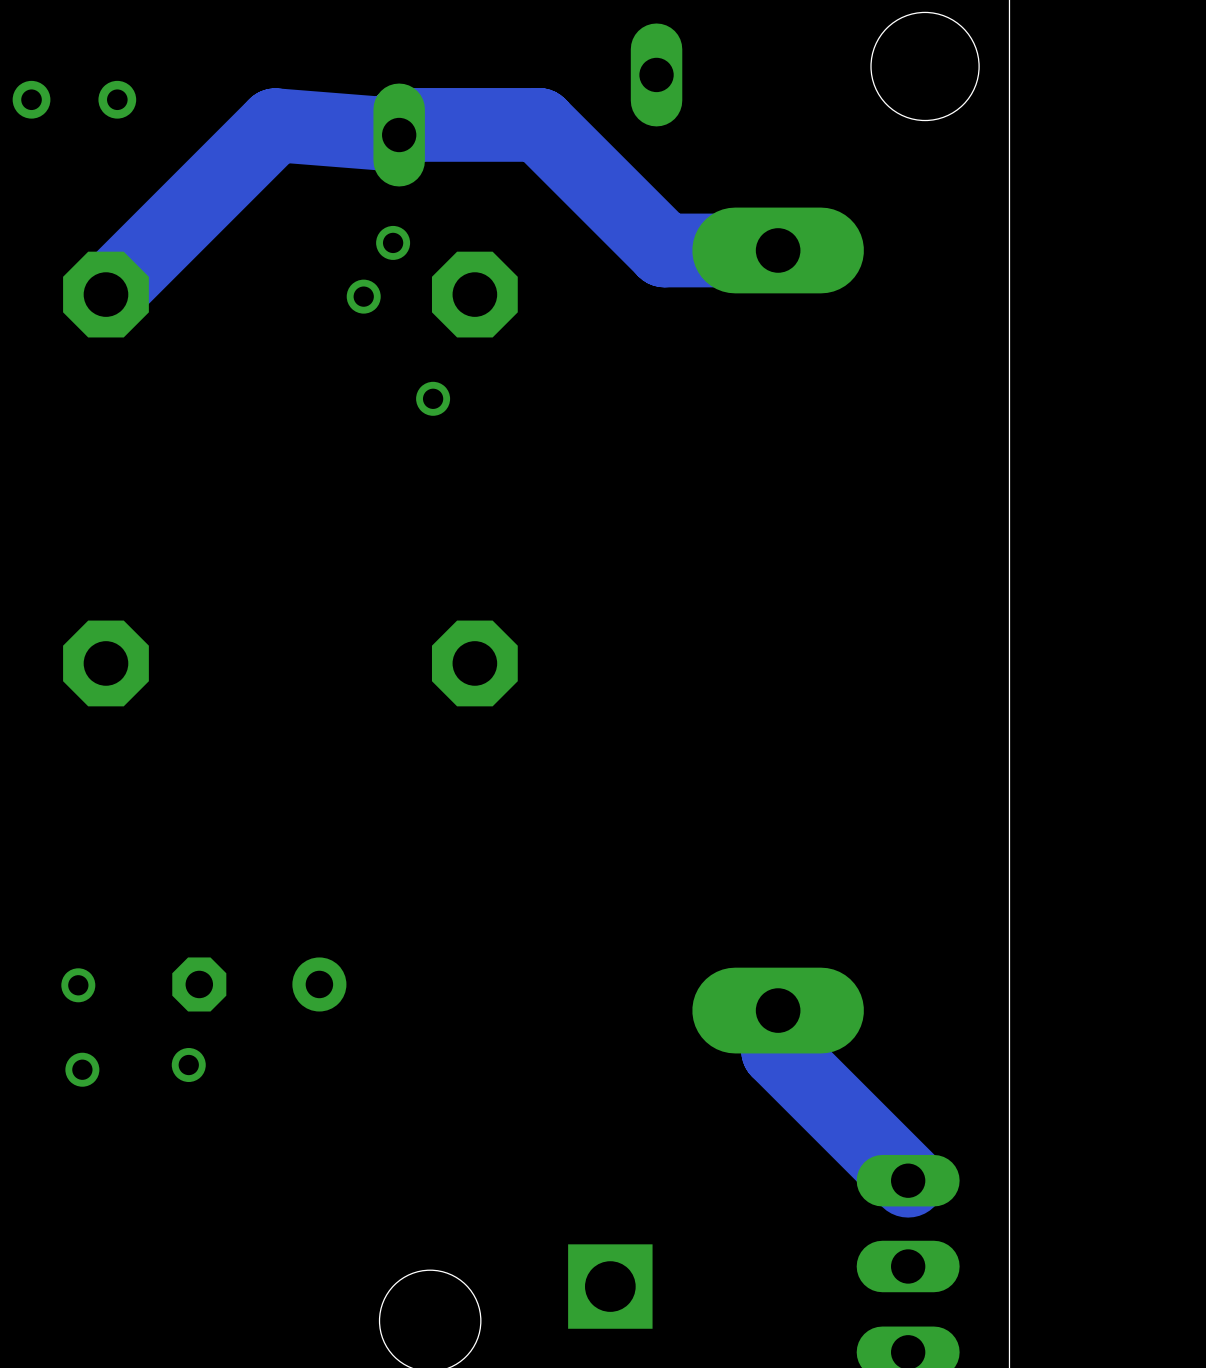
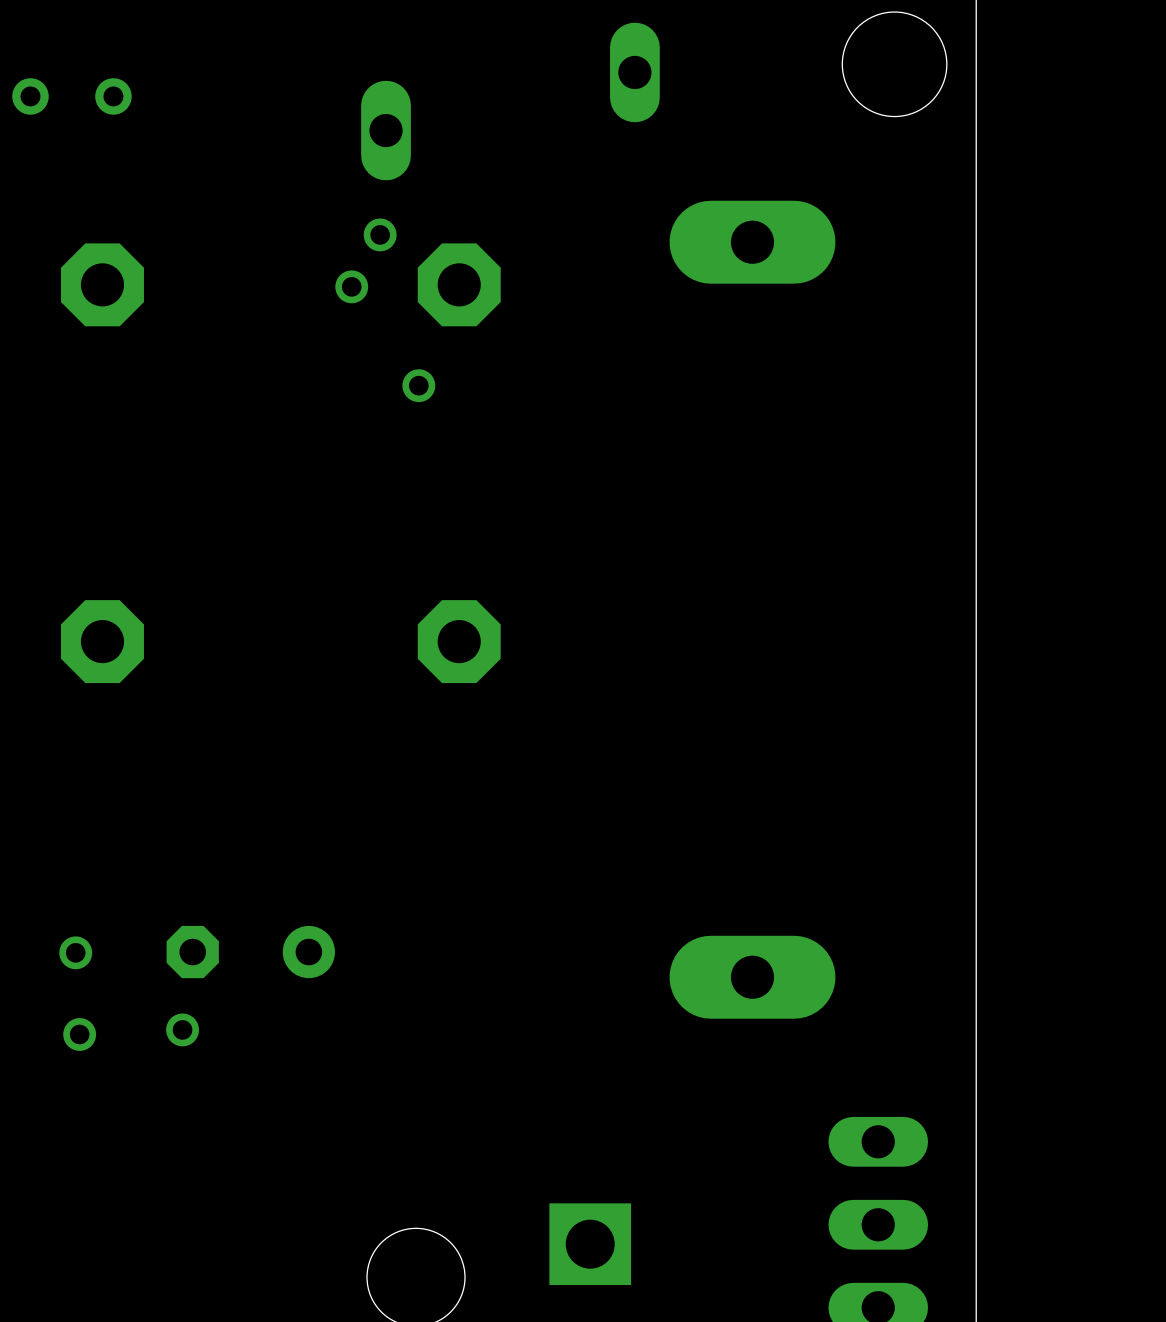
track: (778, 250) (664, 250) (539, 124) (399, 124) (399, 135) (275, 125) (105, 294) -> none
track: (778, 1010) (778, 1050) (908, 1180) -> none

